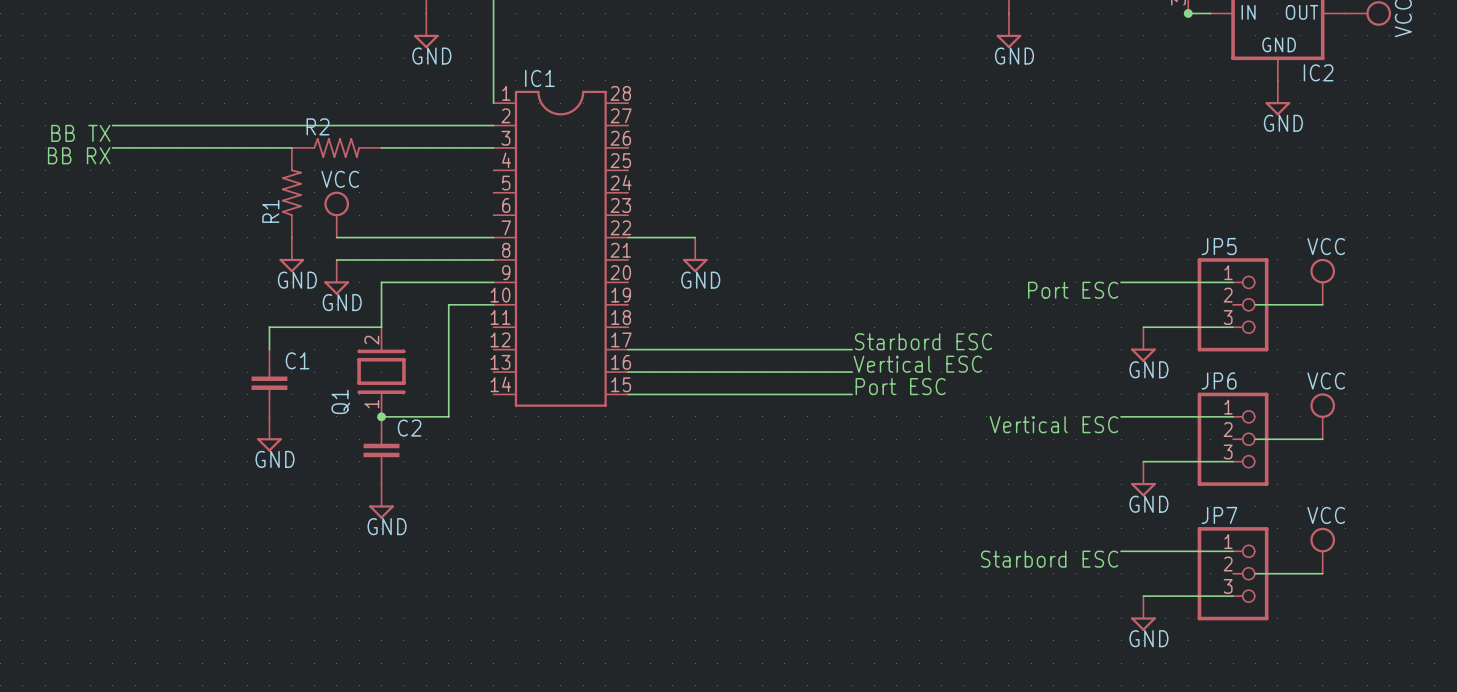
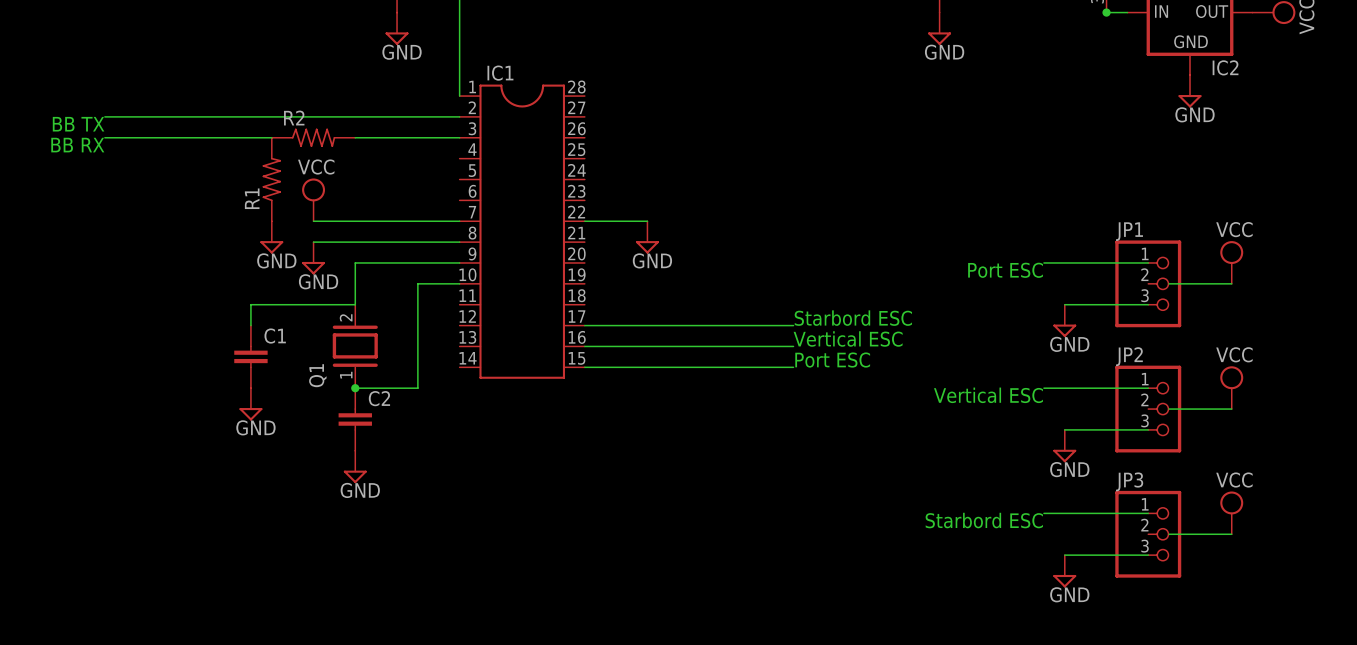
JP5 name: JP5 (1219, 246) -> JP1 (1129, 231)
JP6 name: JP6 (1219, 381) -> JP2 (1129, 356)
JP7 name: JP7 (1219, 515) -> JP3 (1129, 481)

